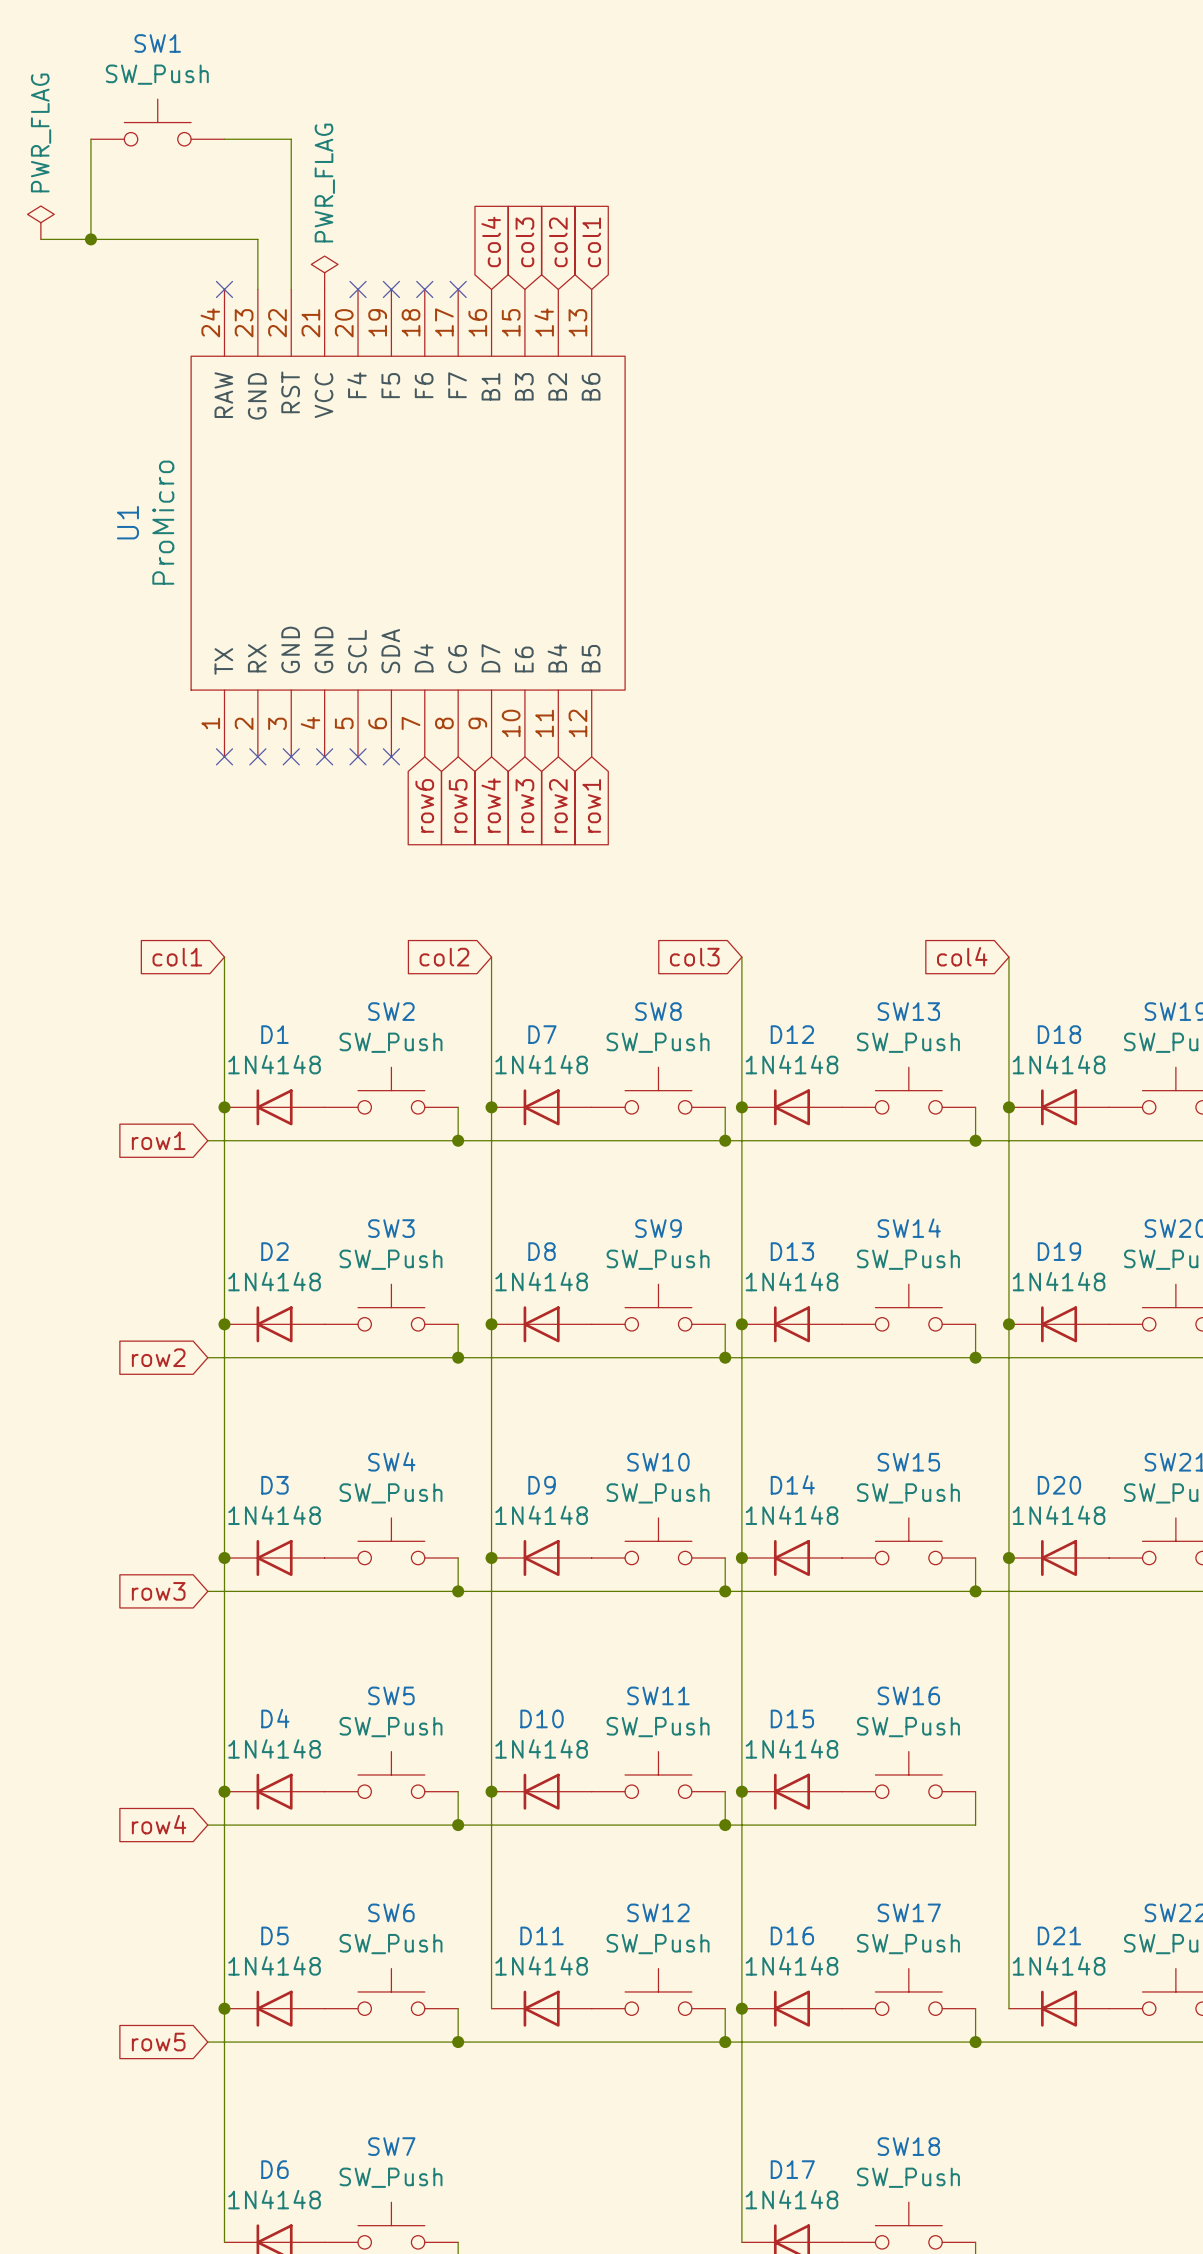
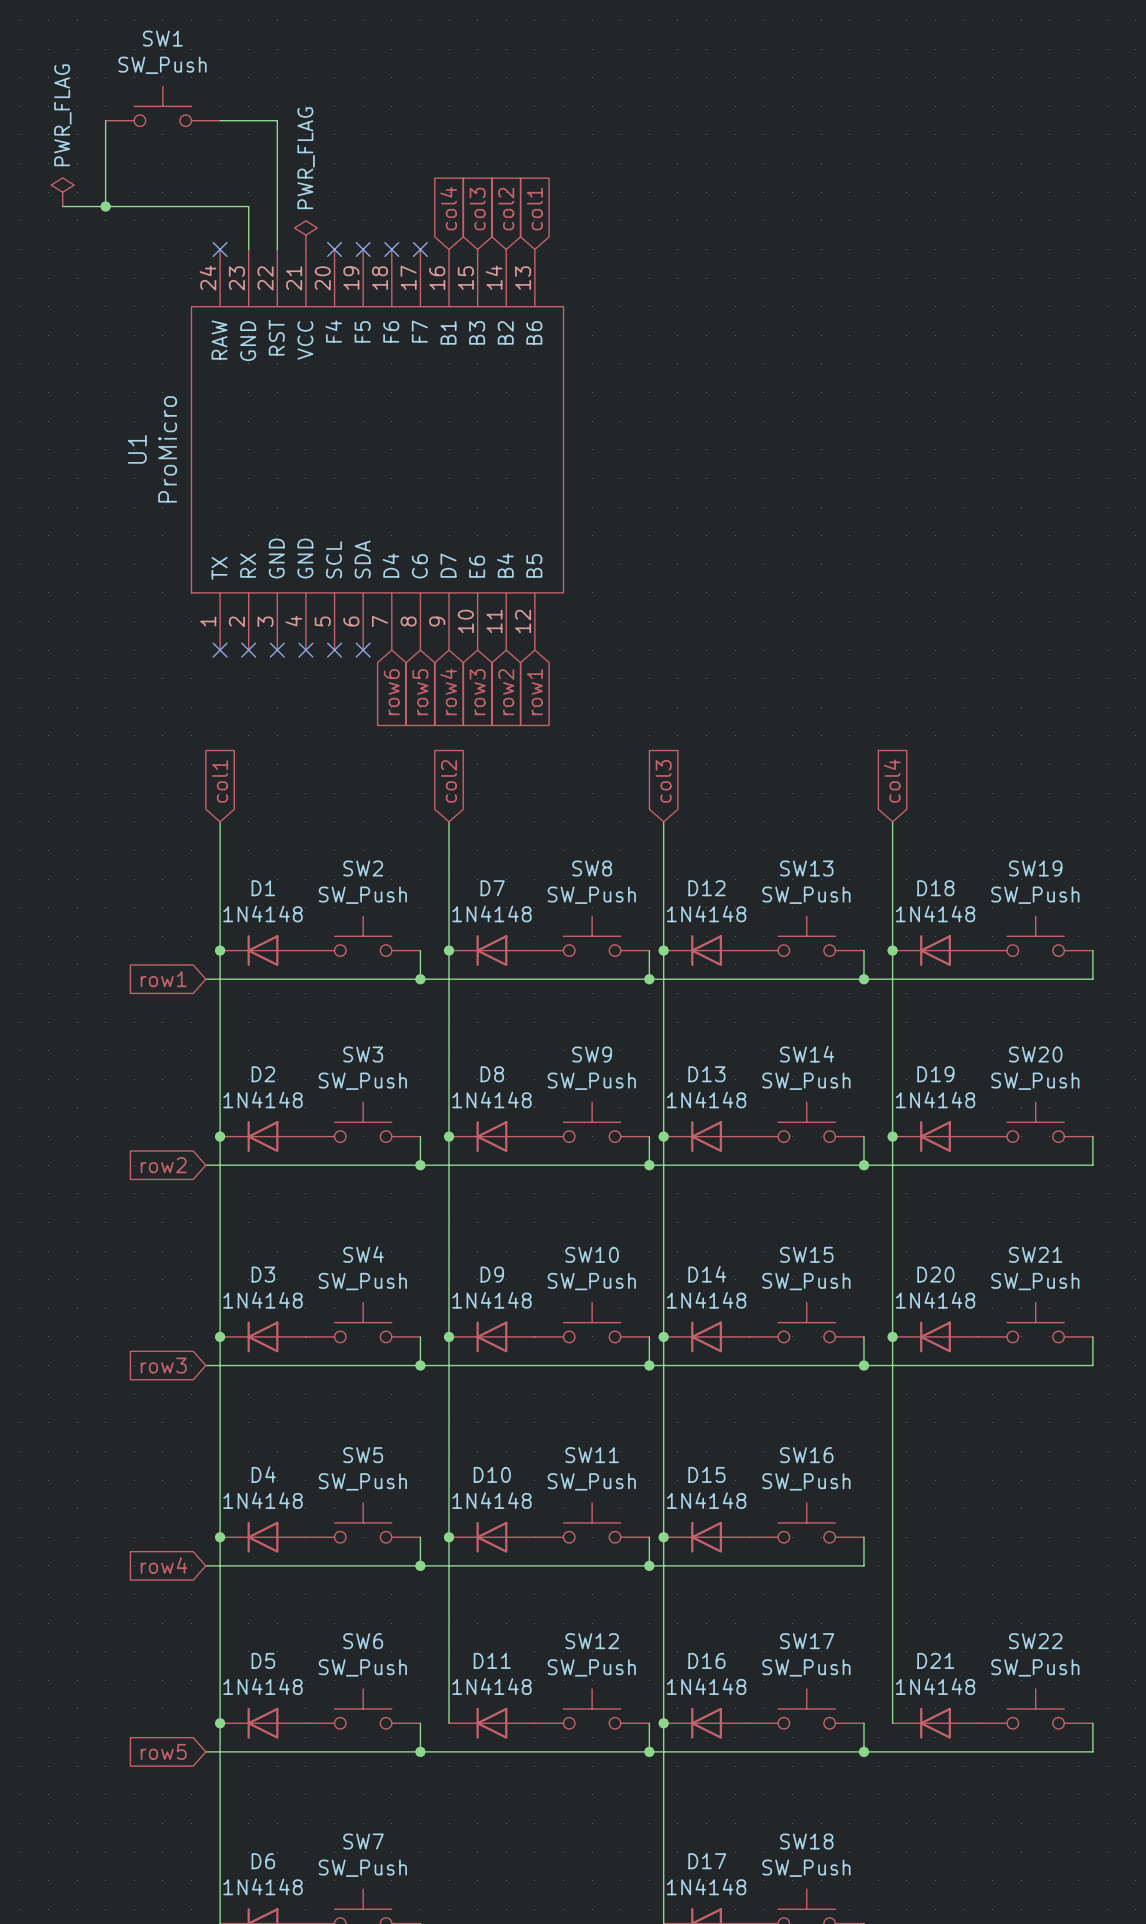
global label rotation: 0° (962, 956) -> 90° clockwise (892, 781)
global label rotation: 0° (177, 957) -> 90° clockwise (220, 781)
global label rotation: 0° (444, 957) -> 90° clockwise (449, 781)
global label rotation: 0° (694, 957) -> 90° clockwise (663, 781)

